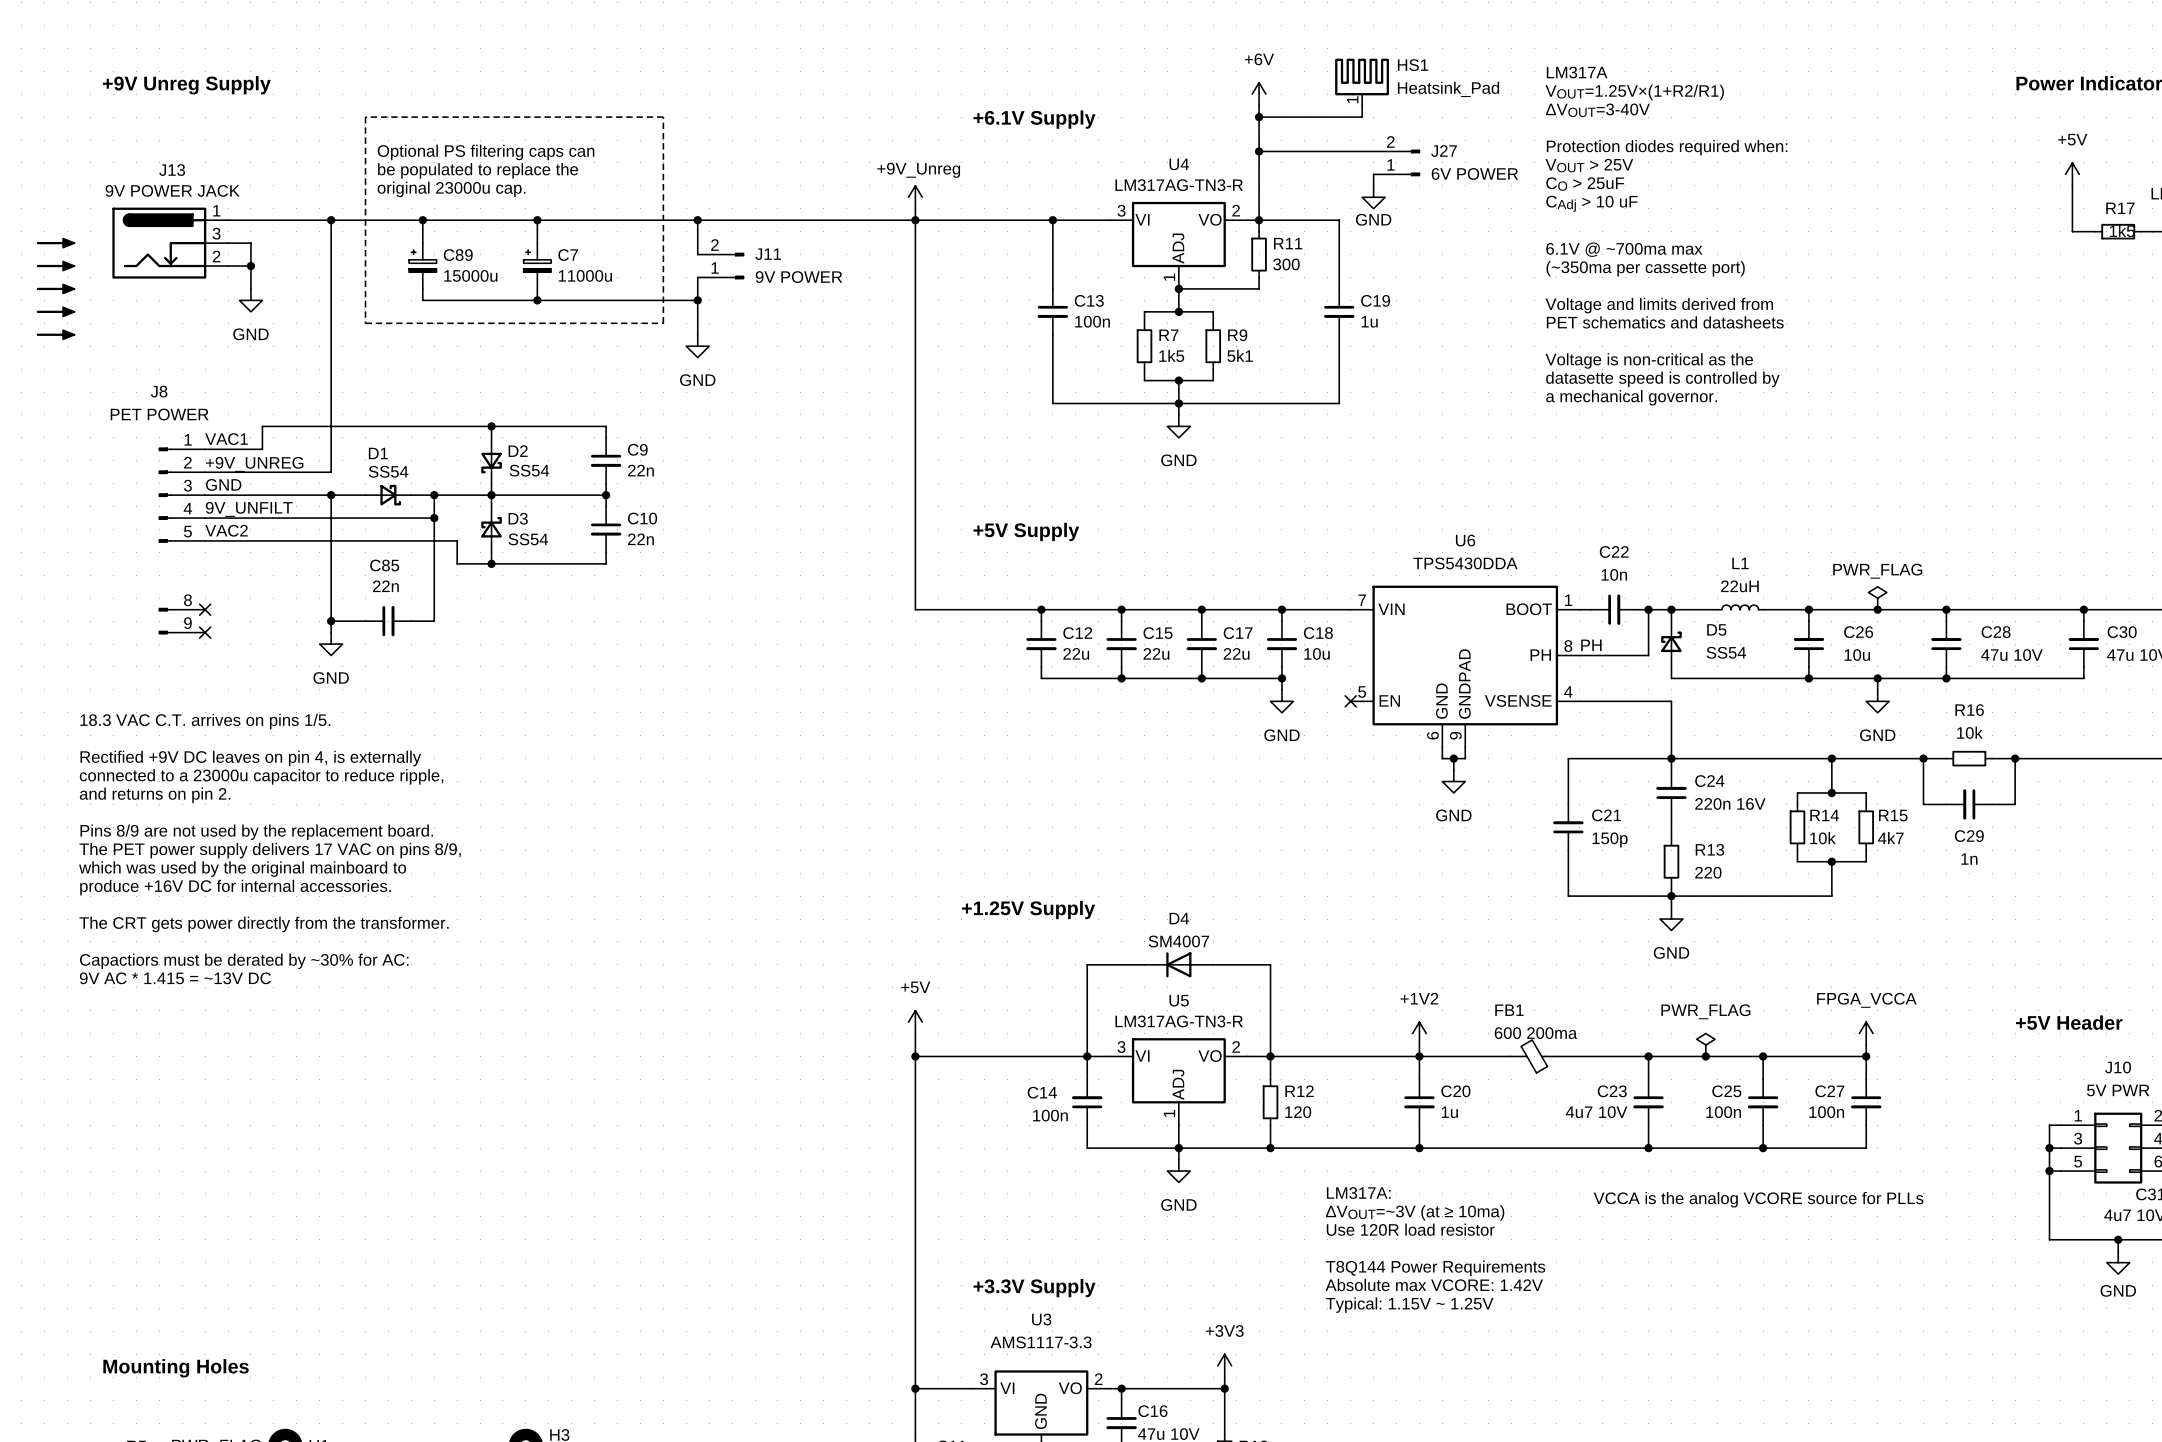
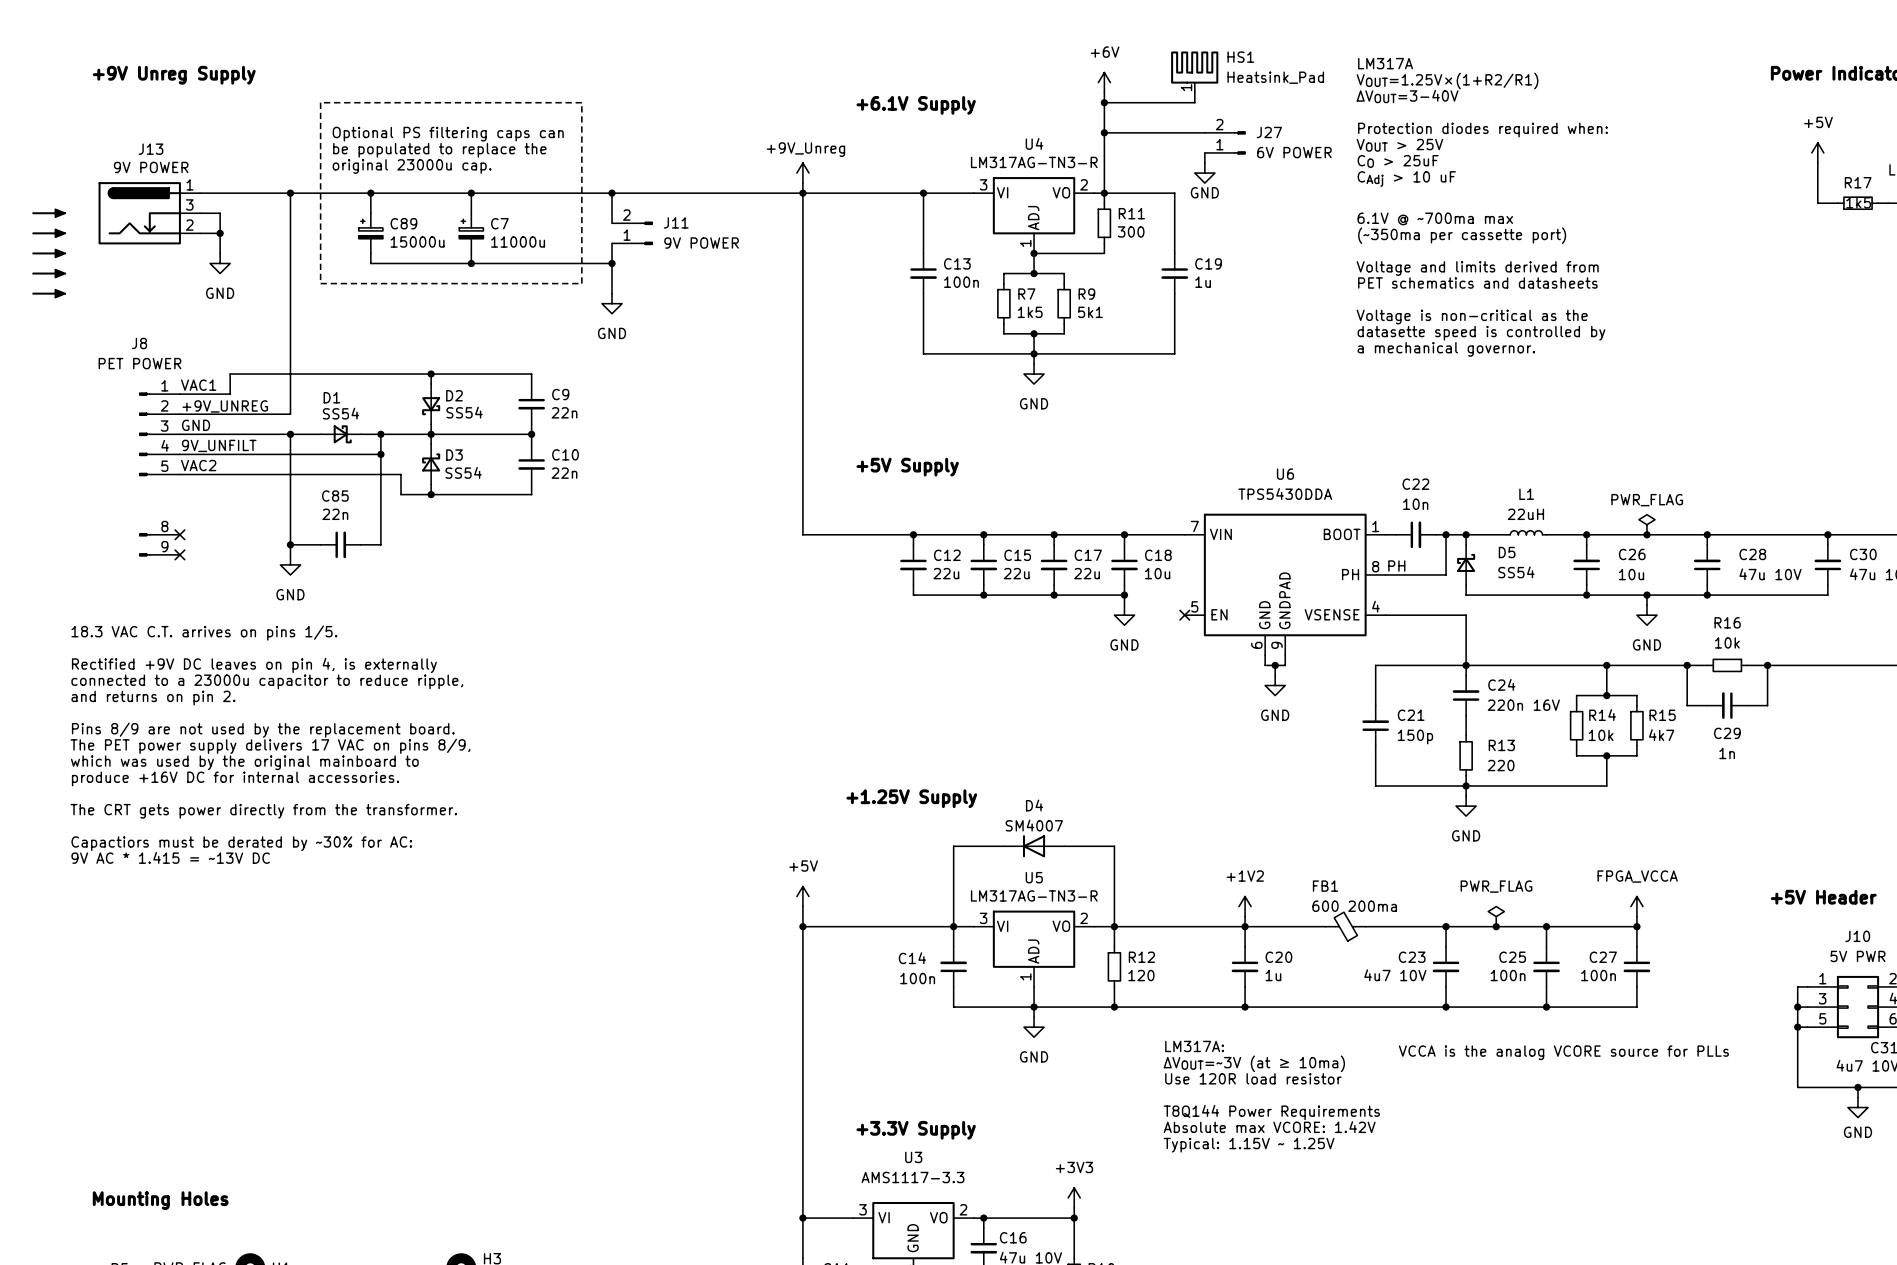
J13 value: 9V POWER JACK (172, 190) -> 9V POWER (151, 167)

